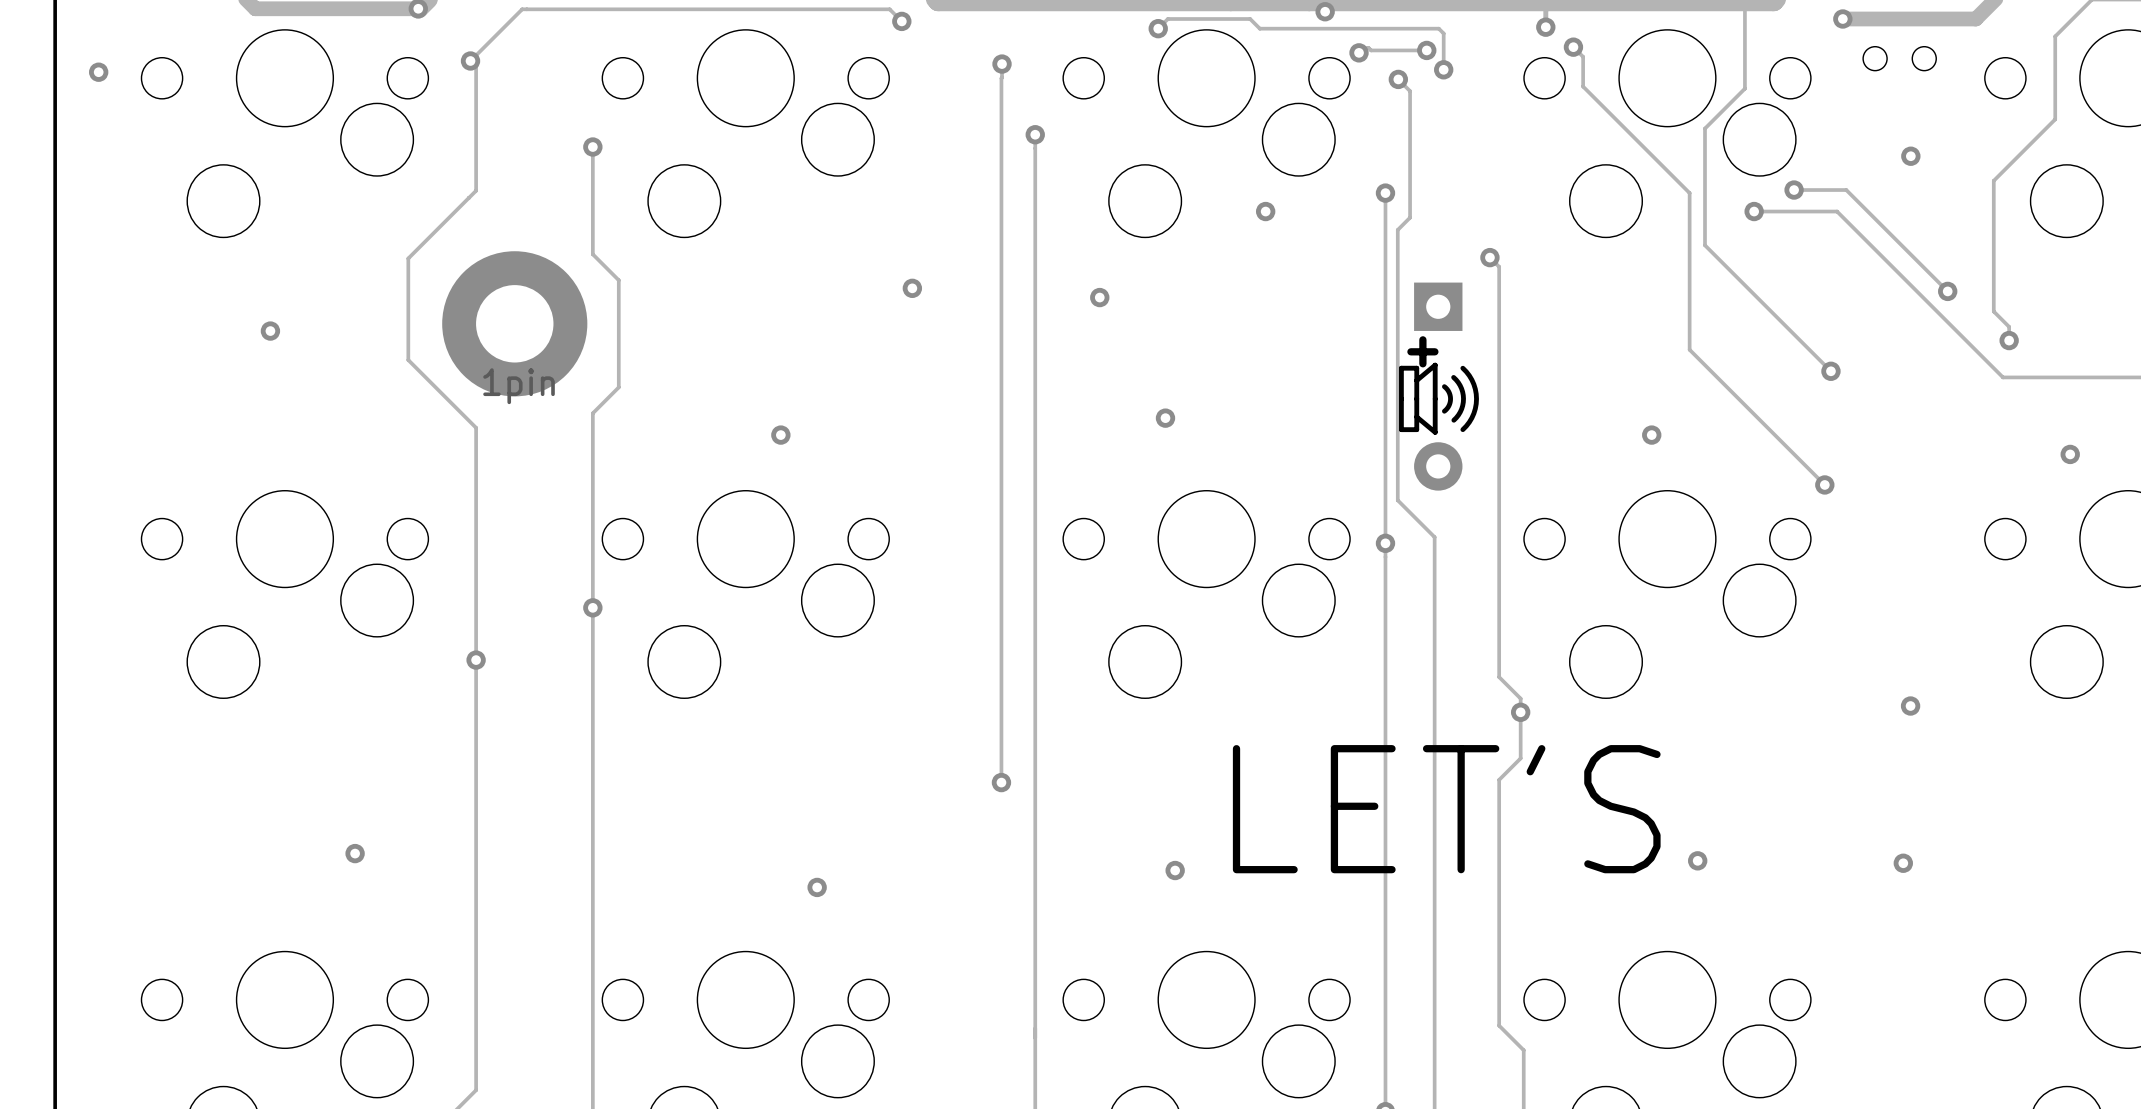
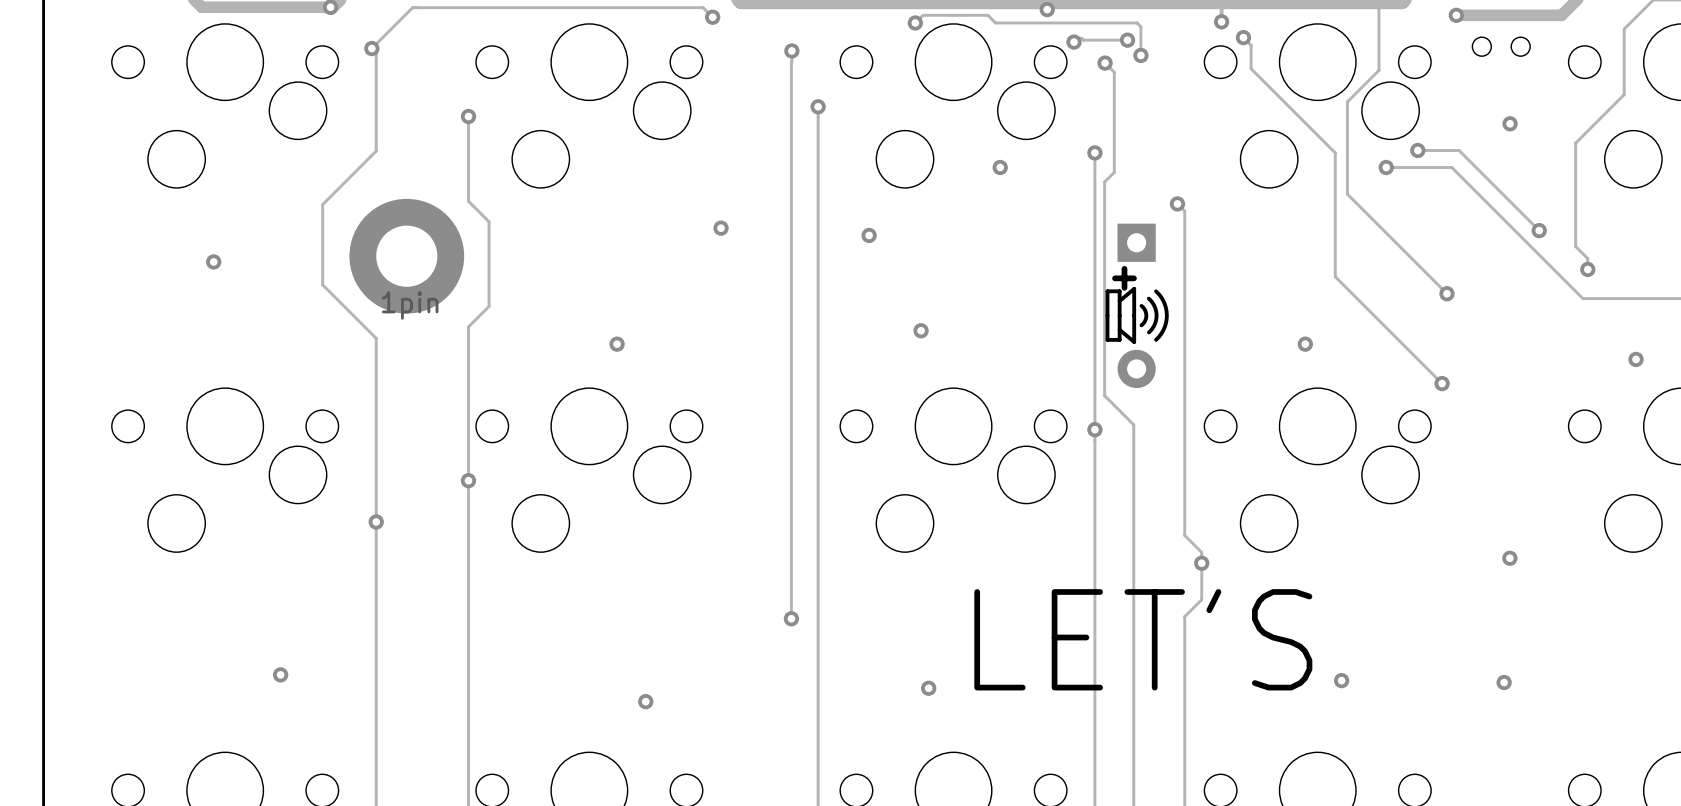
via: (98, 72) -> none

